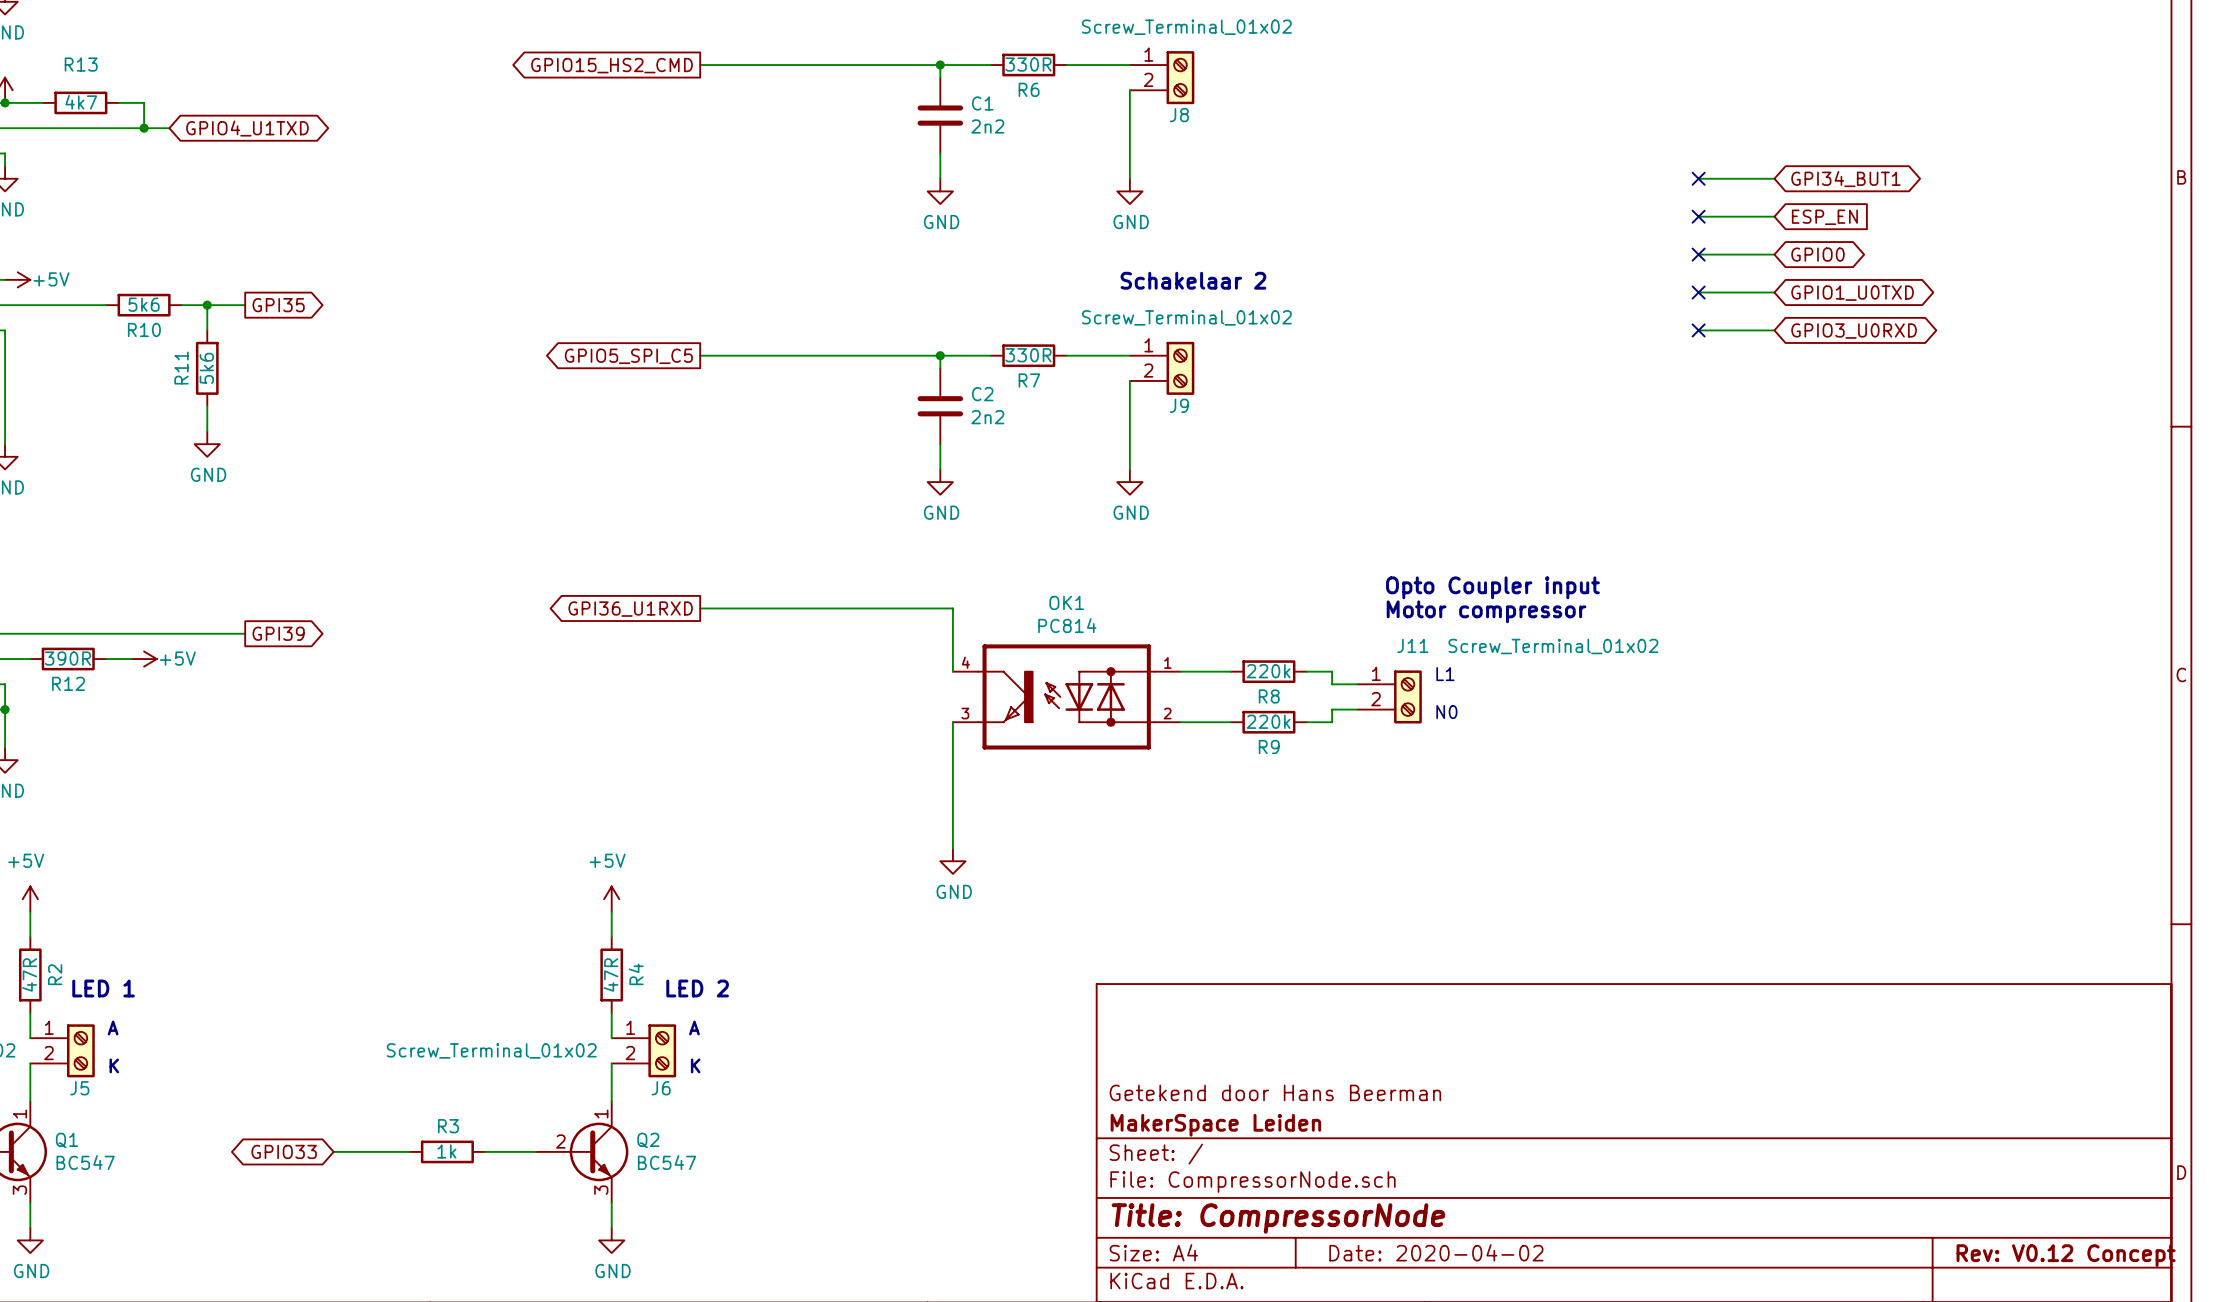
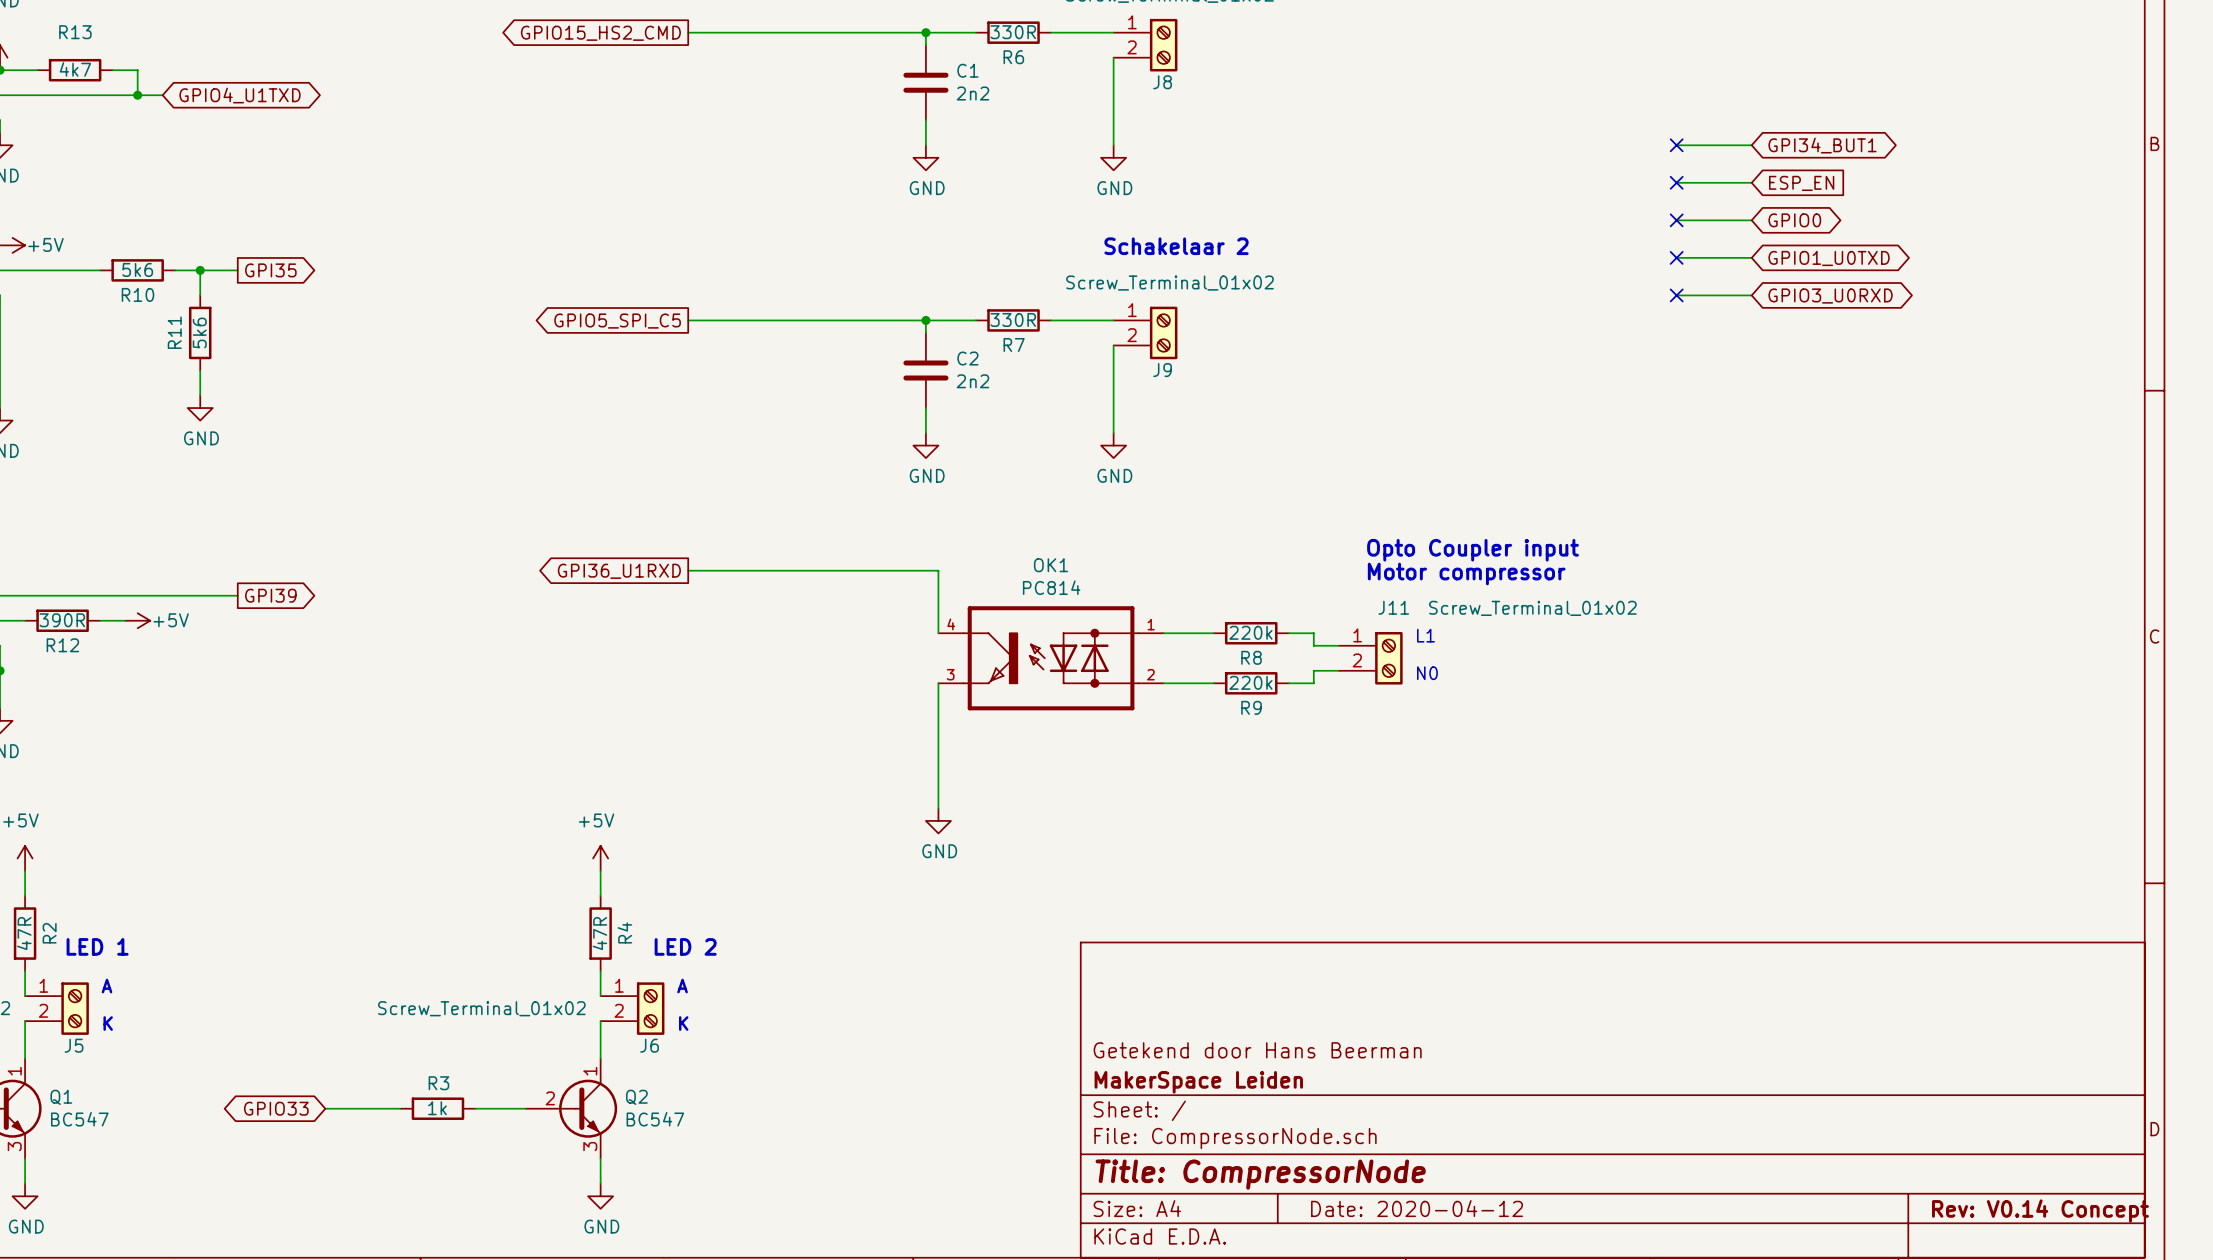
title block: Date: 2020-04-02 (1436, 1252) -> Date: 2020-04-12 (1417, 1208)
title block: Rev: V0.12 Concept (2066, 1255) -> Rev: V0.14 Concept (2040, 1211)

